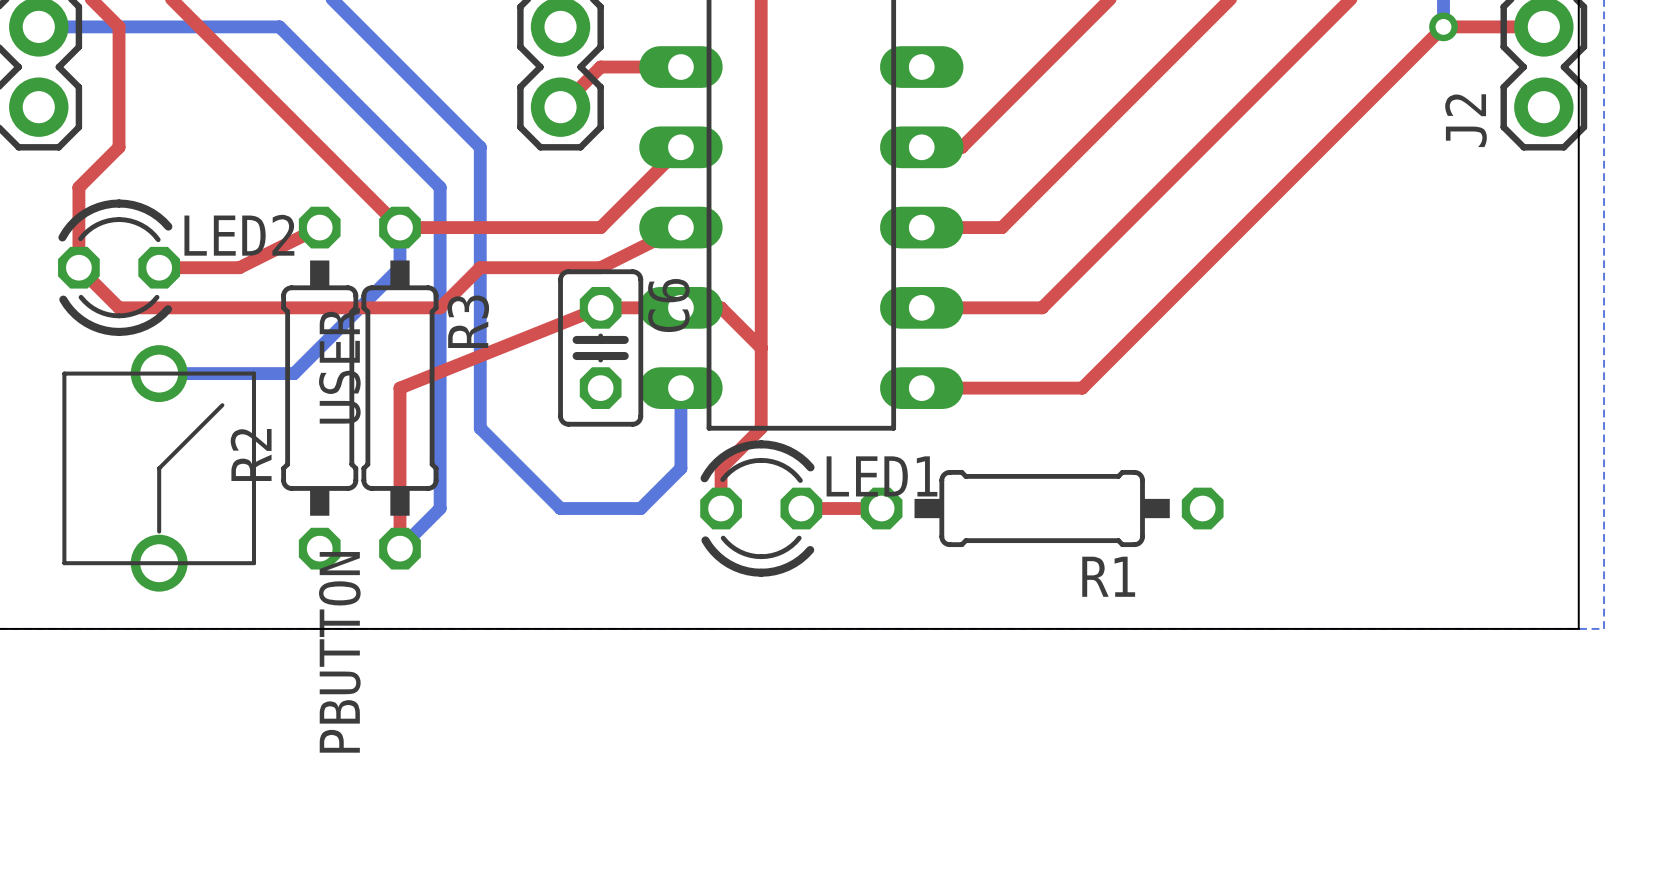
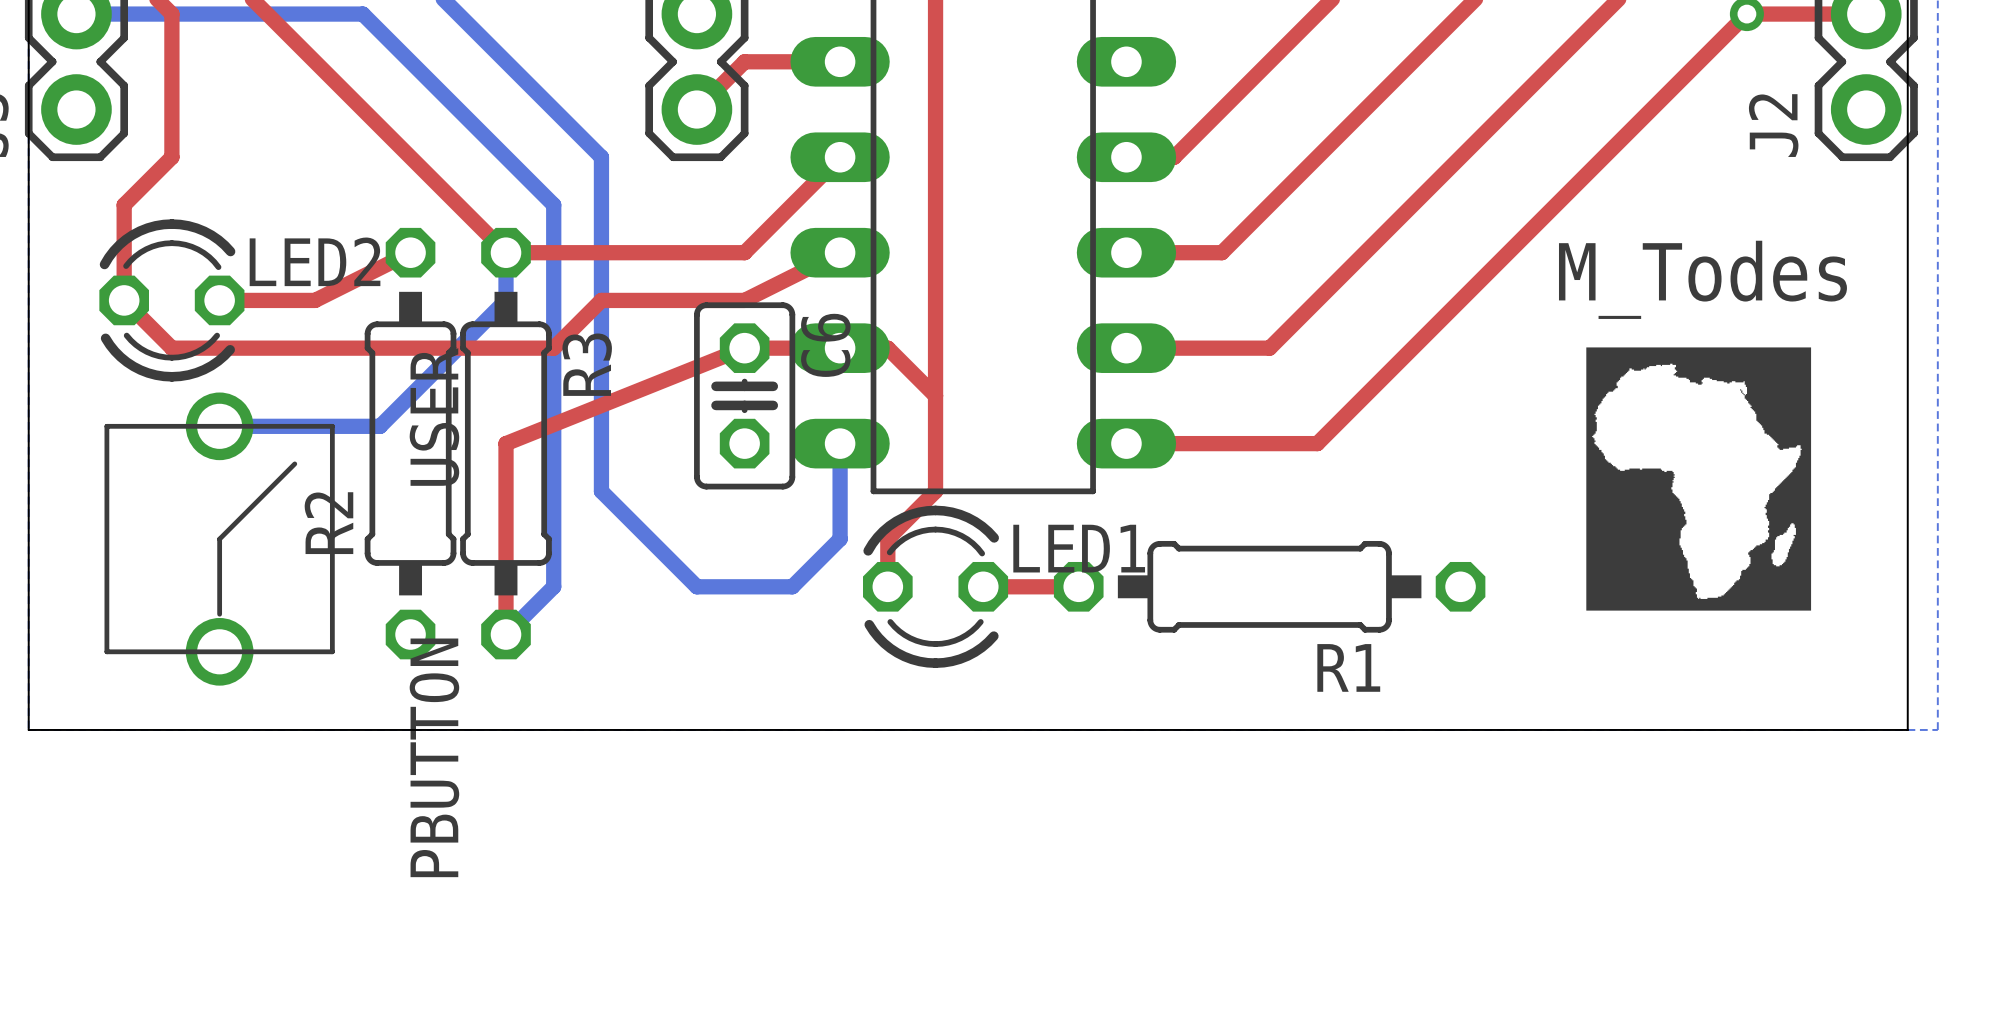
text: none -> M_Todes (1702, 279)
drawing: none -> [1586, 347, 1812, 611]

